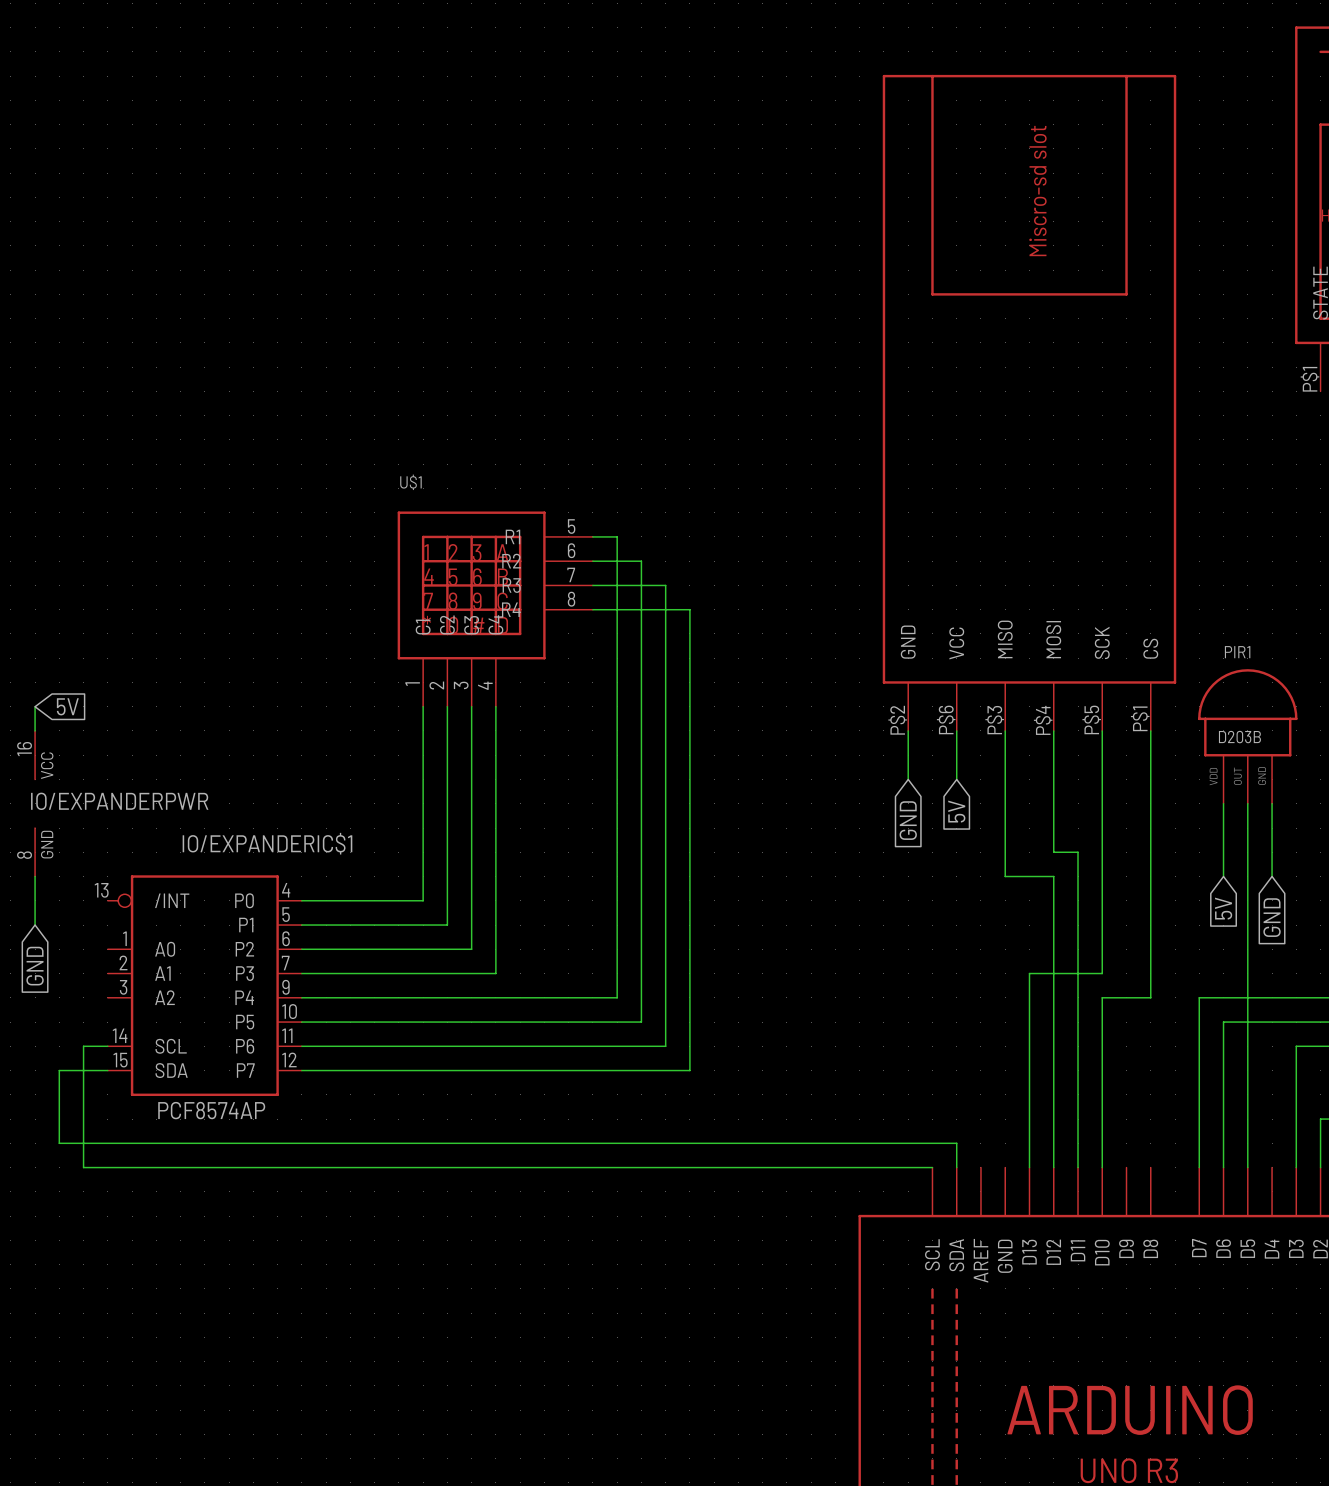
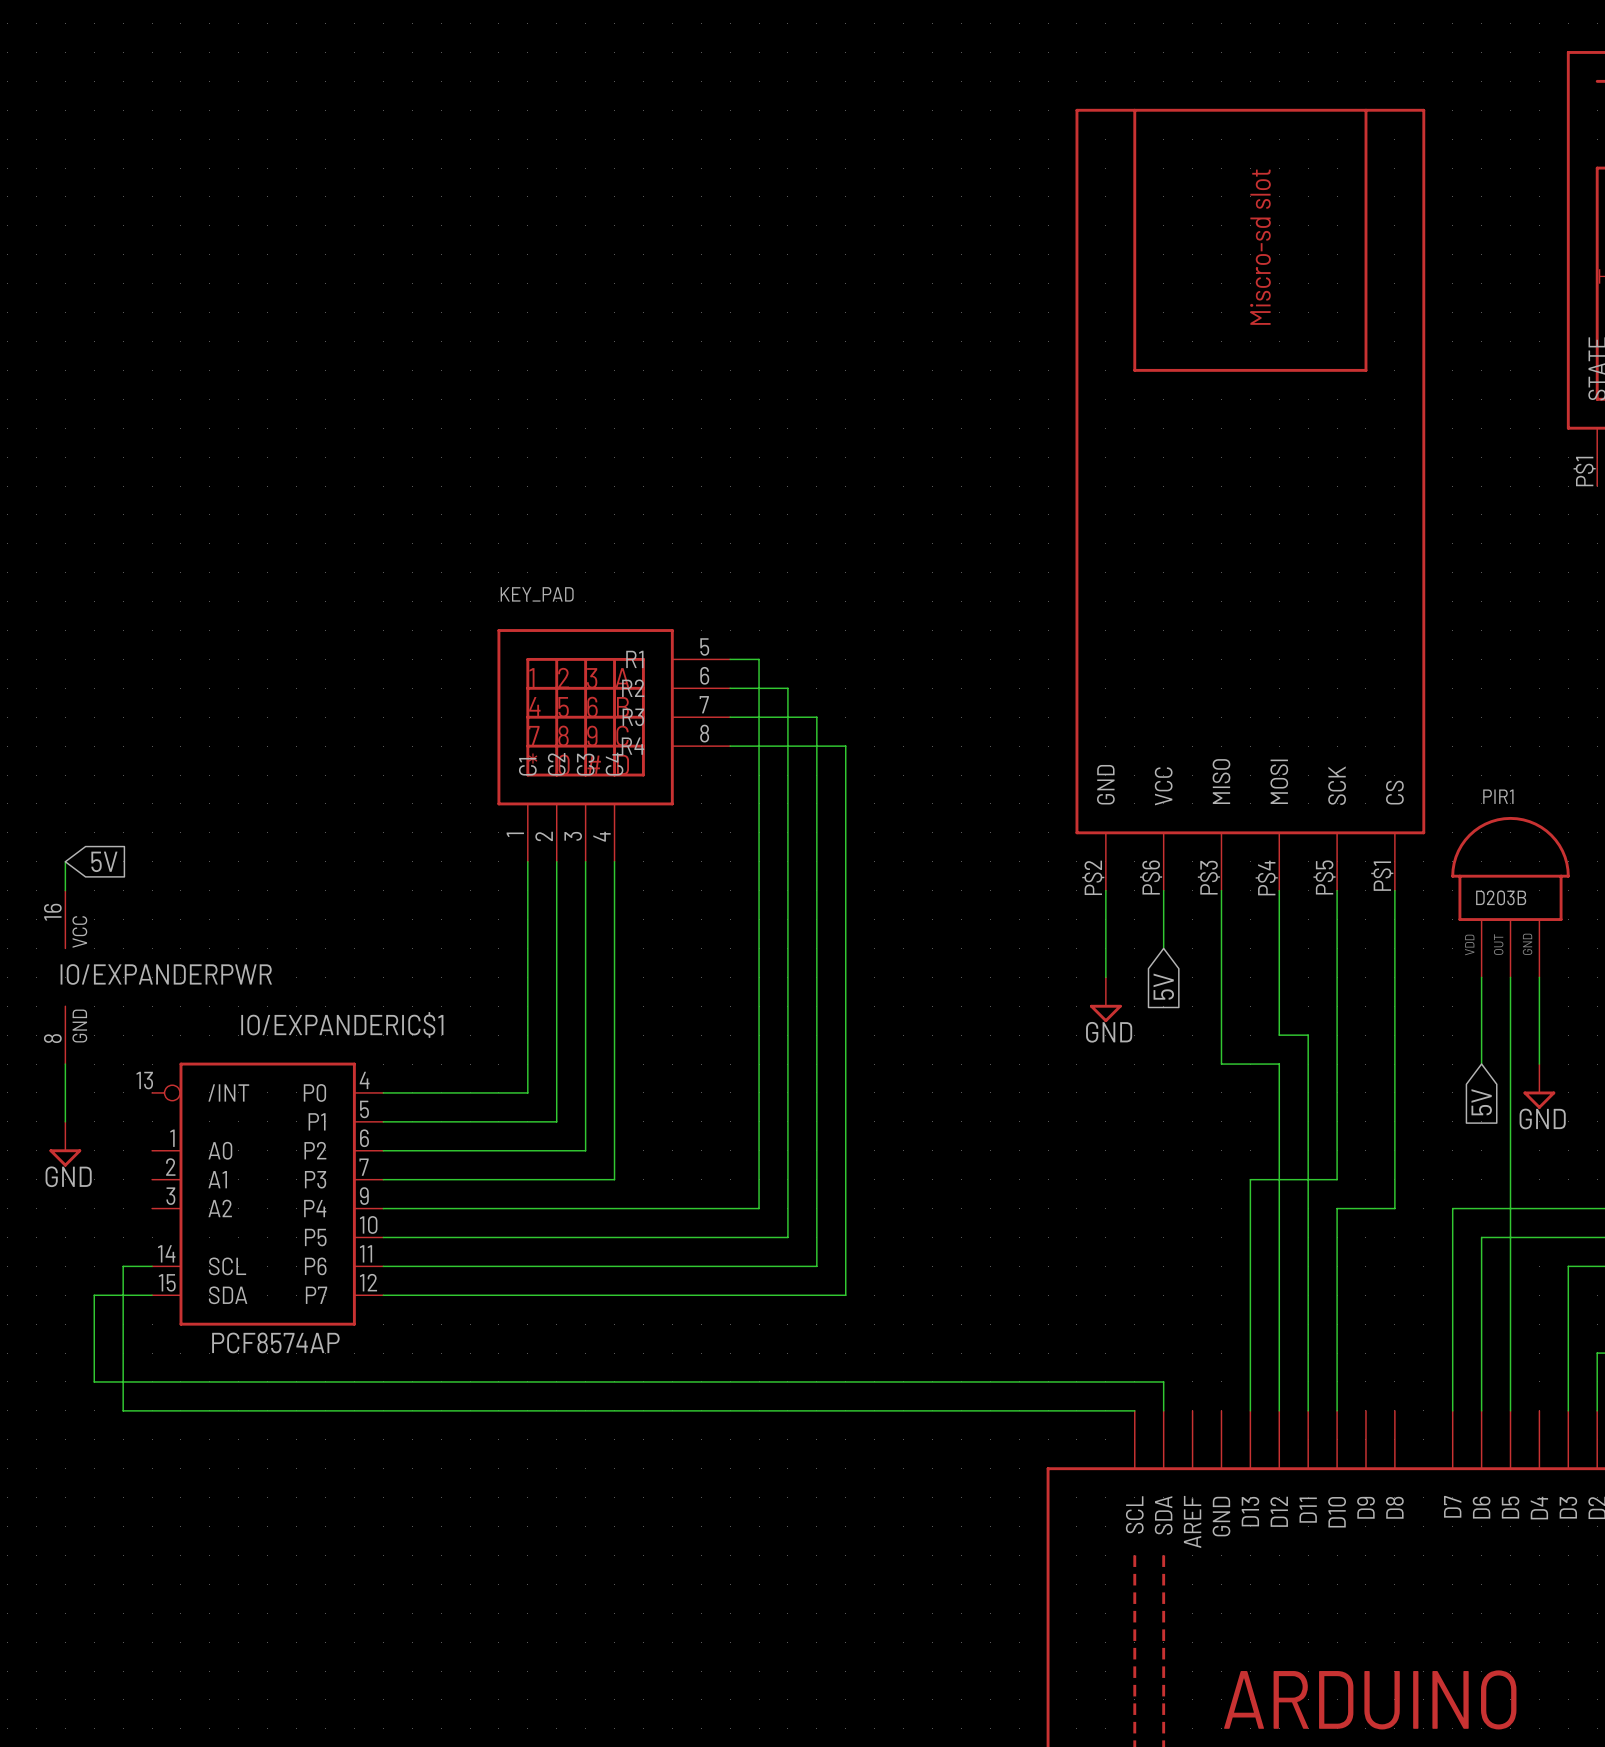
U$1 name: U$1 (410, 482) -> KEY_PAD (537, 594)
wire: none -> (1105, 948) (1105, 977)
global label: GND (908, 820) -> none
power symbol: none -> GND (1105, 999)
power symbol: none -> GND (1539, 1086)
global label: GND (1272, 917) -> none
power symbol: none -> GND (65, 1144)
global label: GND (35, 966) -> none

